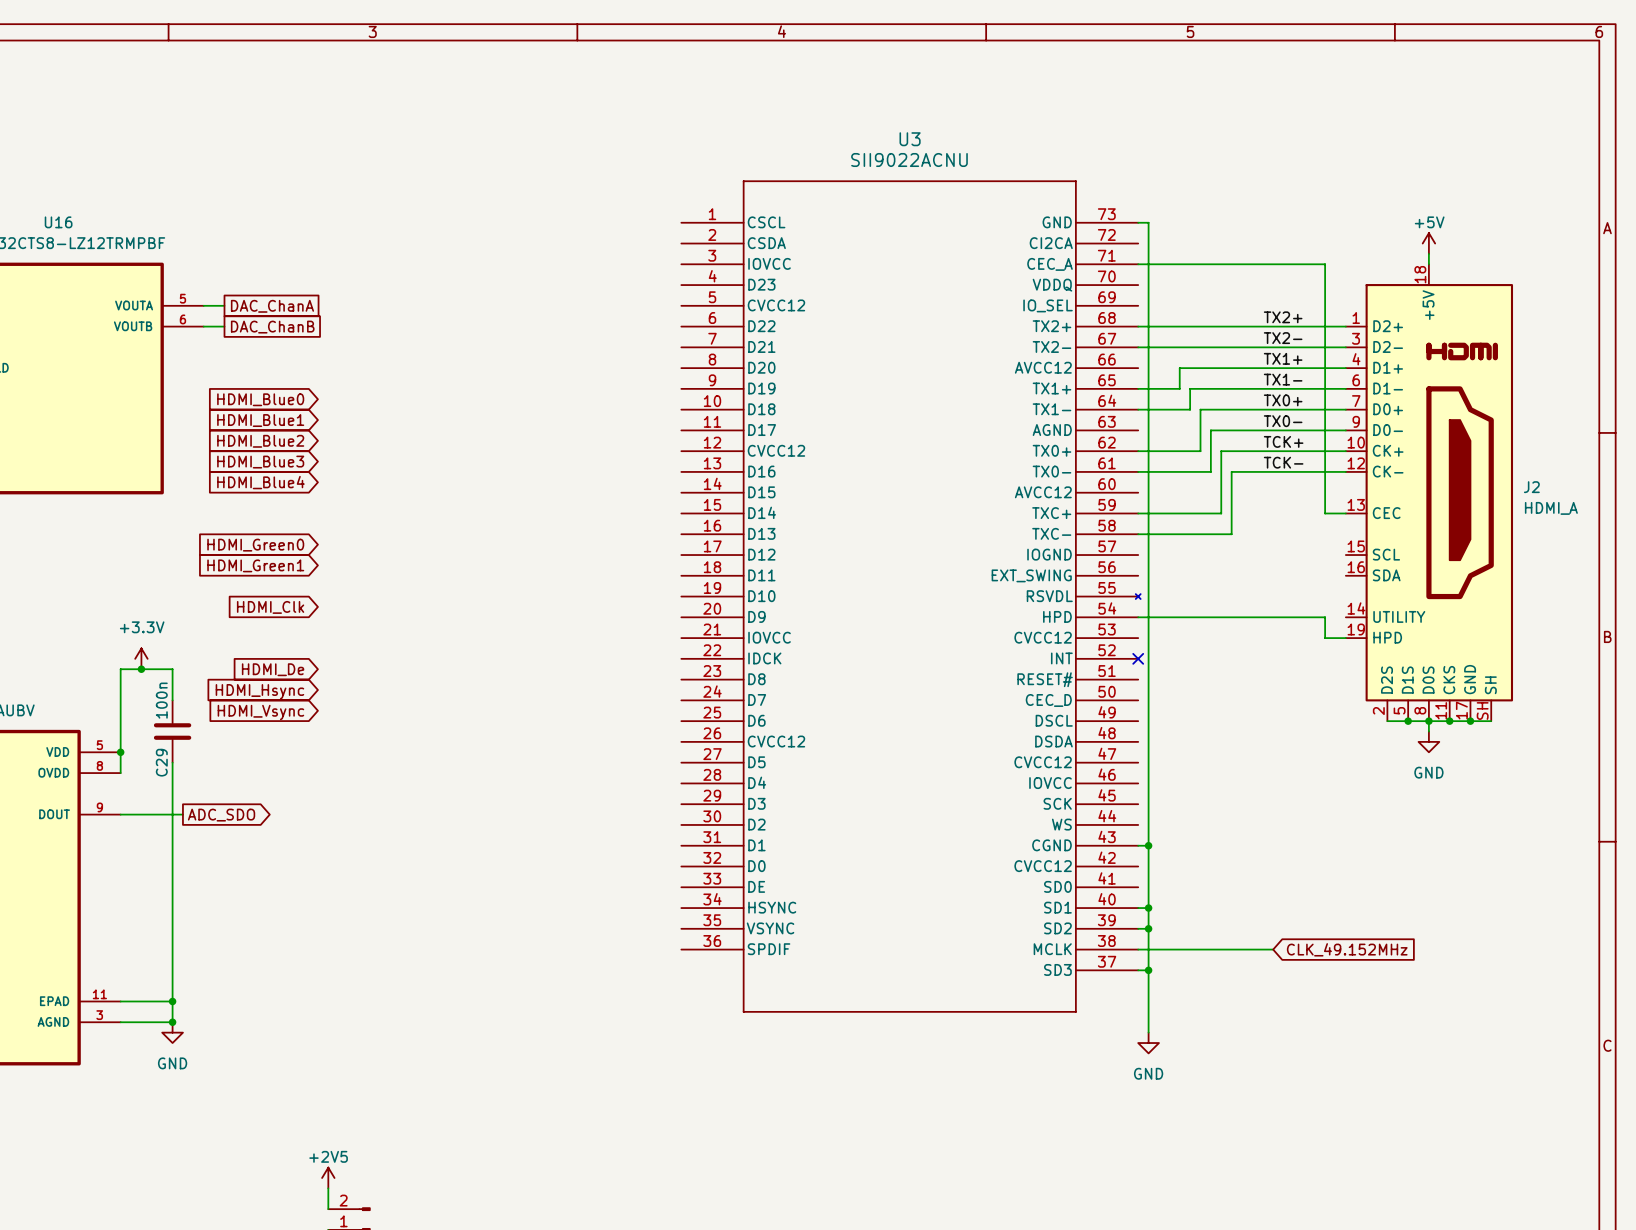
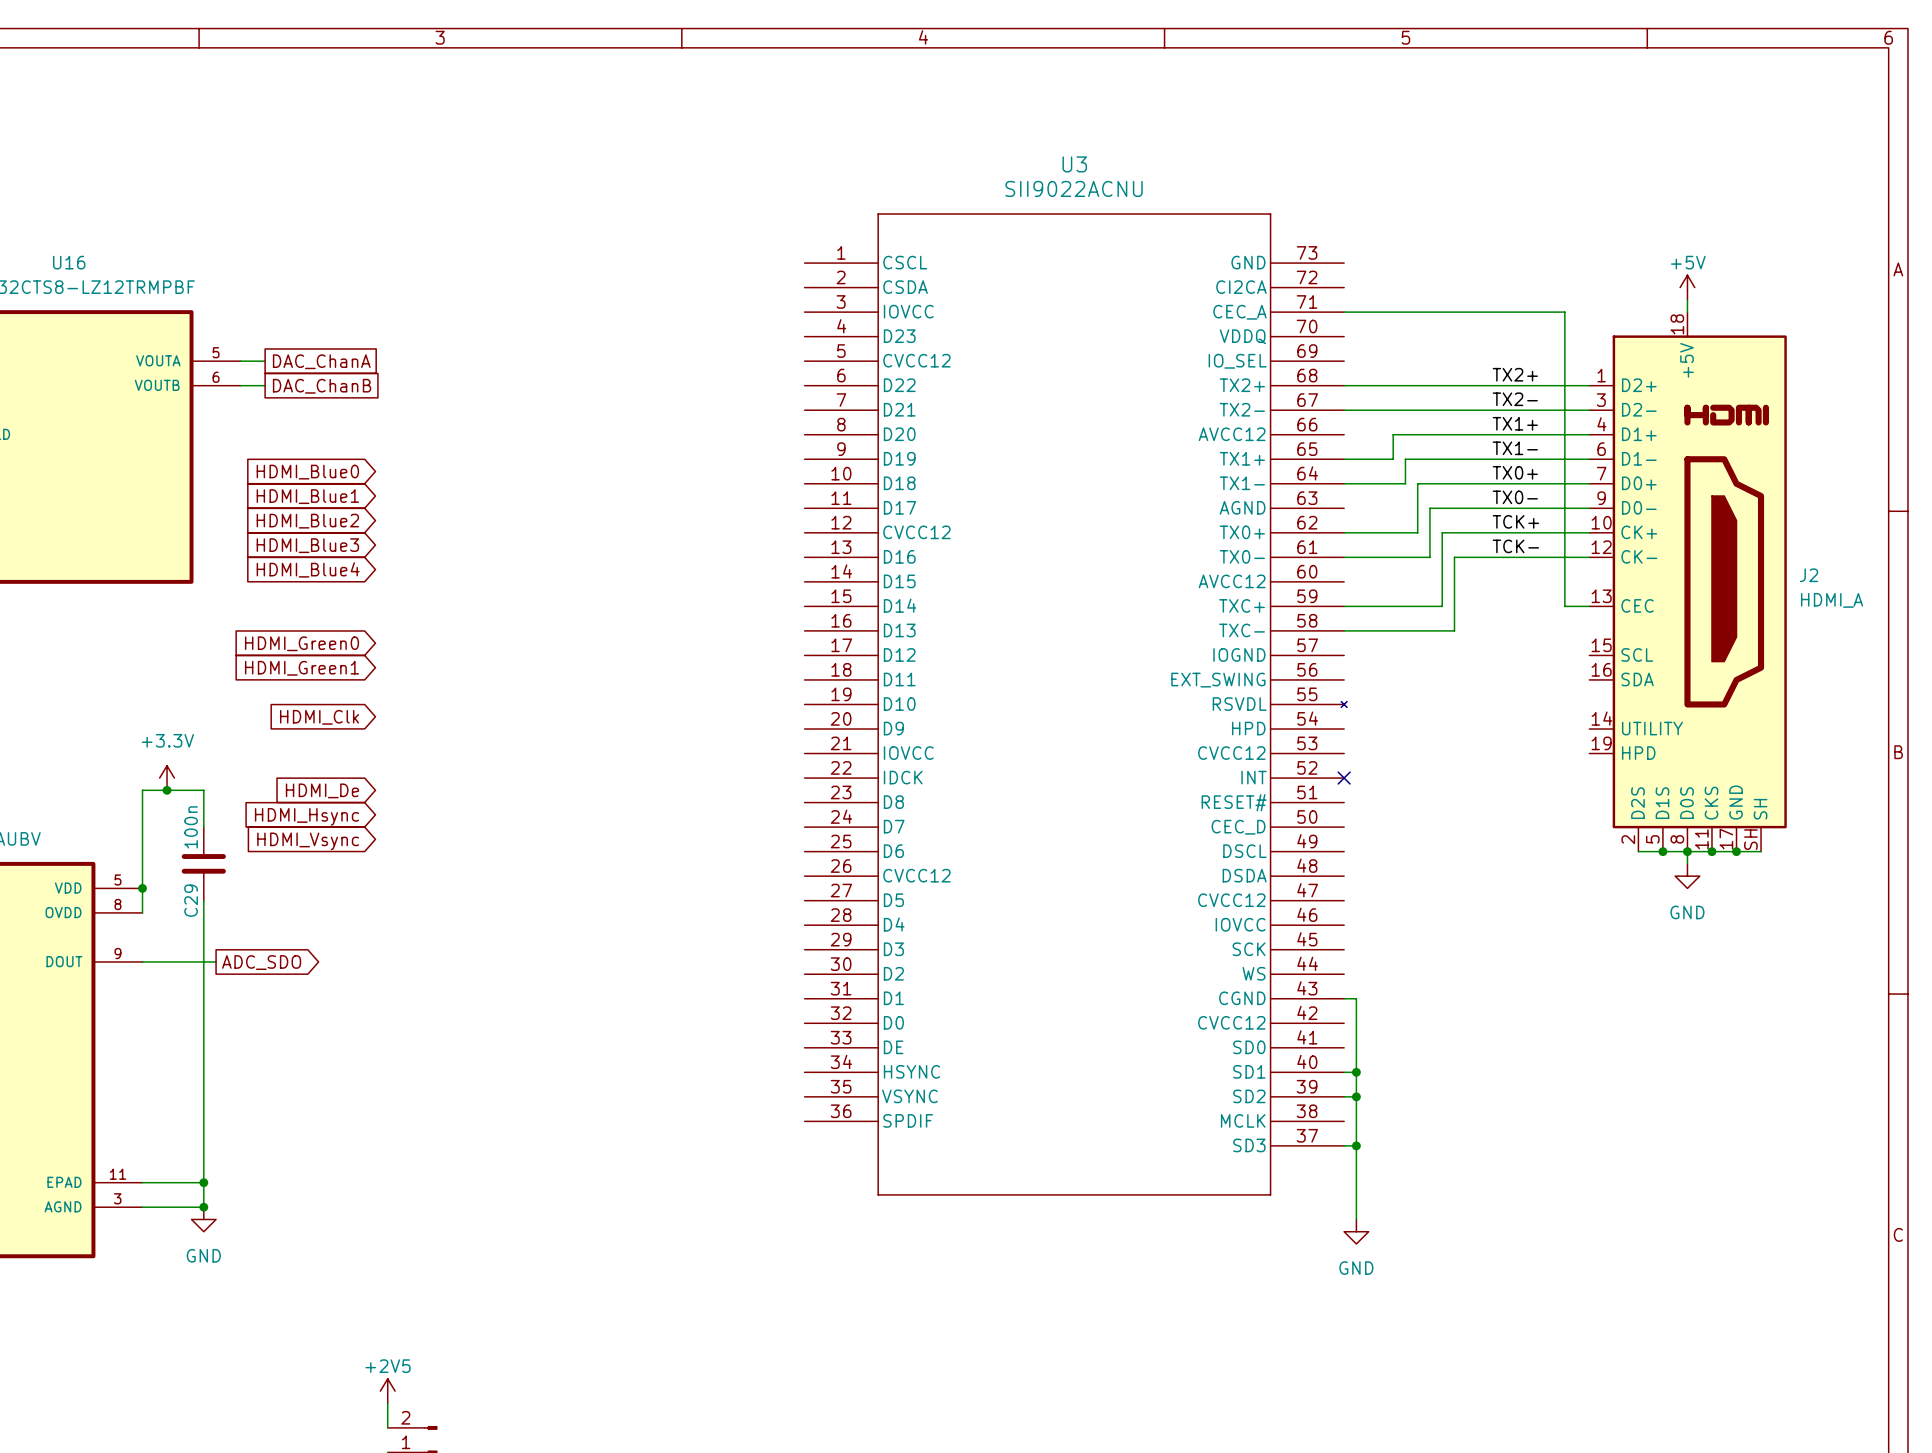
wire: (1138, 222) (1148, 222) (1148, 845) -> none
wire: (1138, 617) (1325, 617) (1325, 638) (1345, 638) -> none
junction: (1148, 845) -> none
wire: (1138, 949) (1273, 949) -> none
global label: CLK_49.152MHz (1347, 949) -> none

